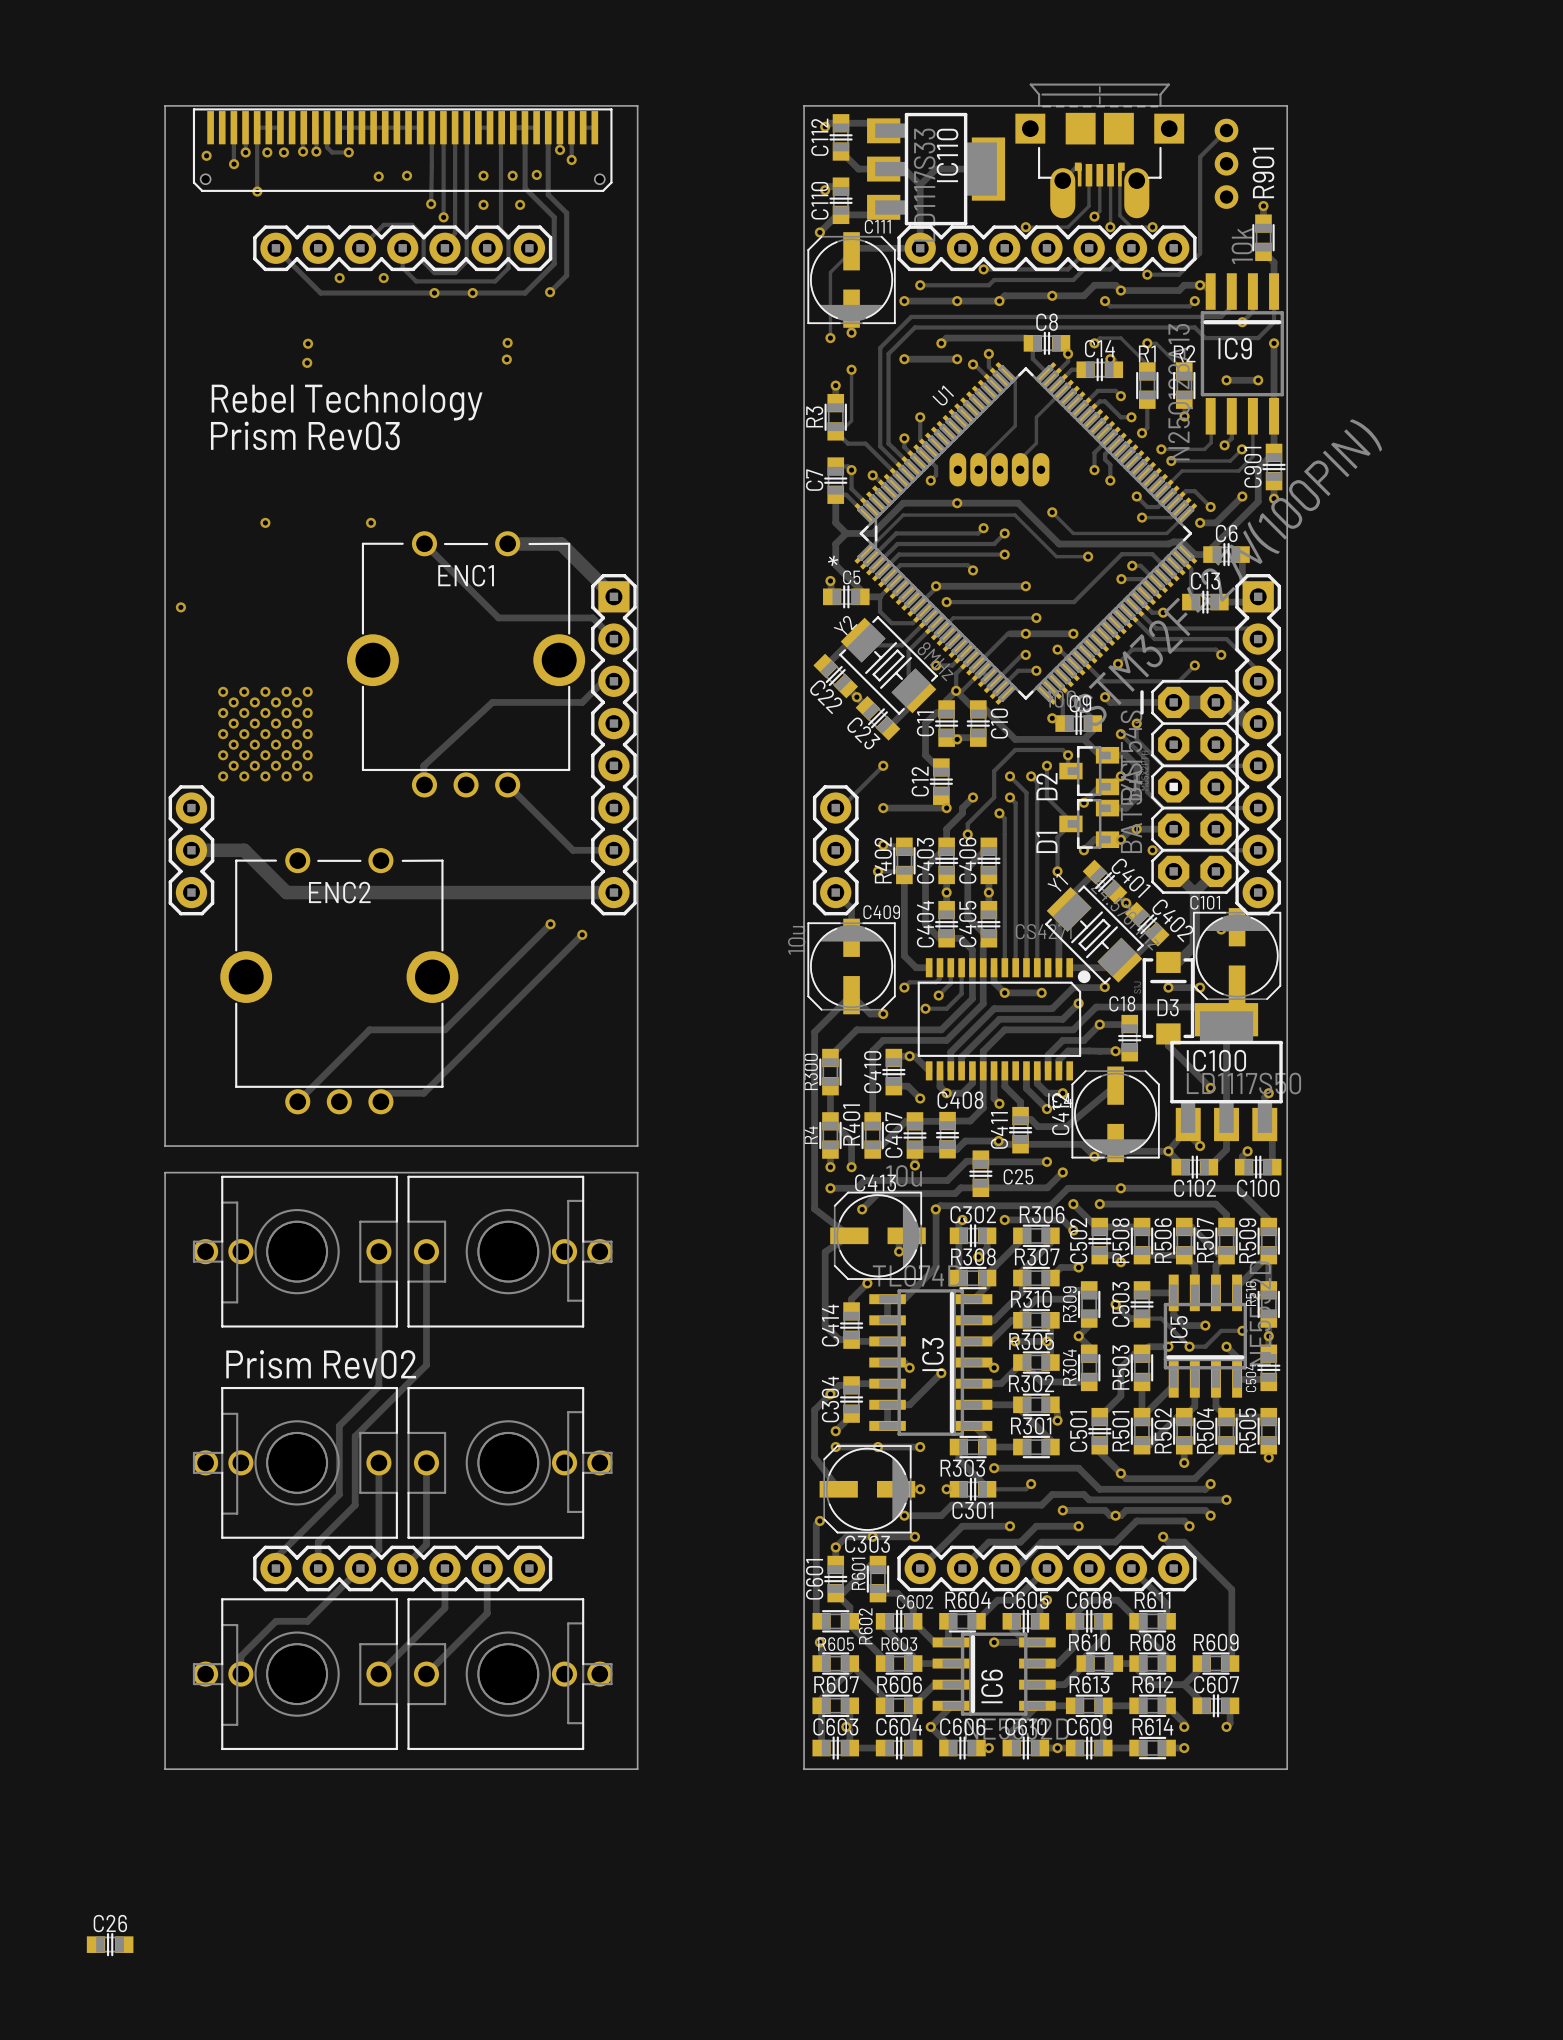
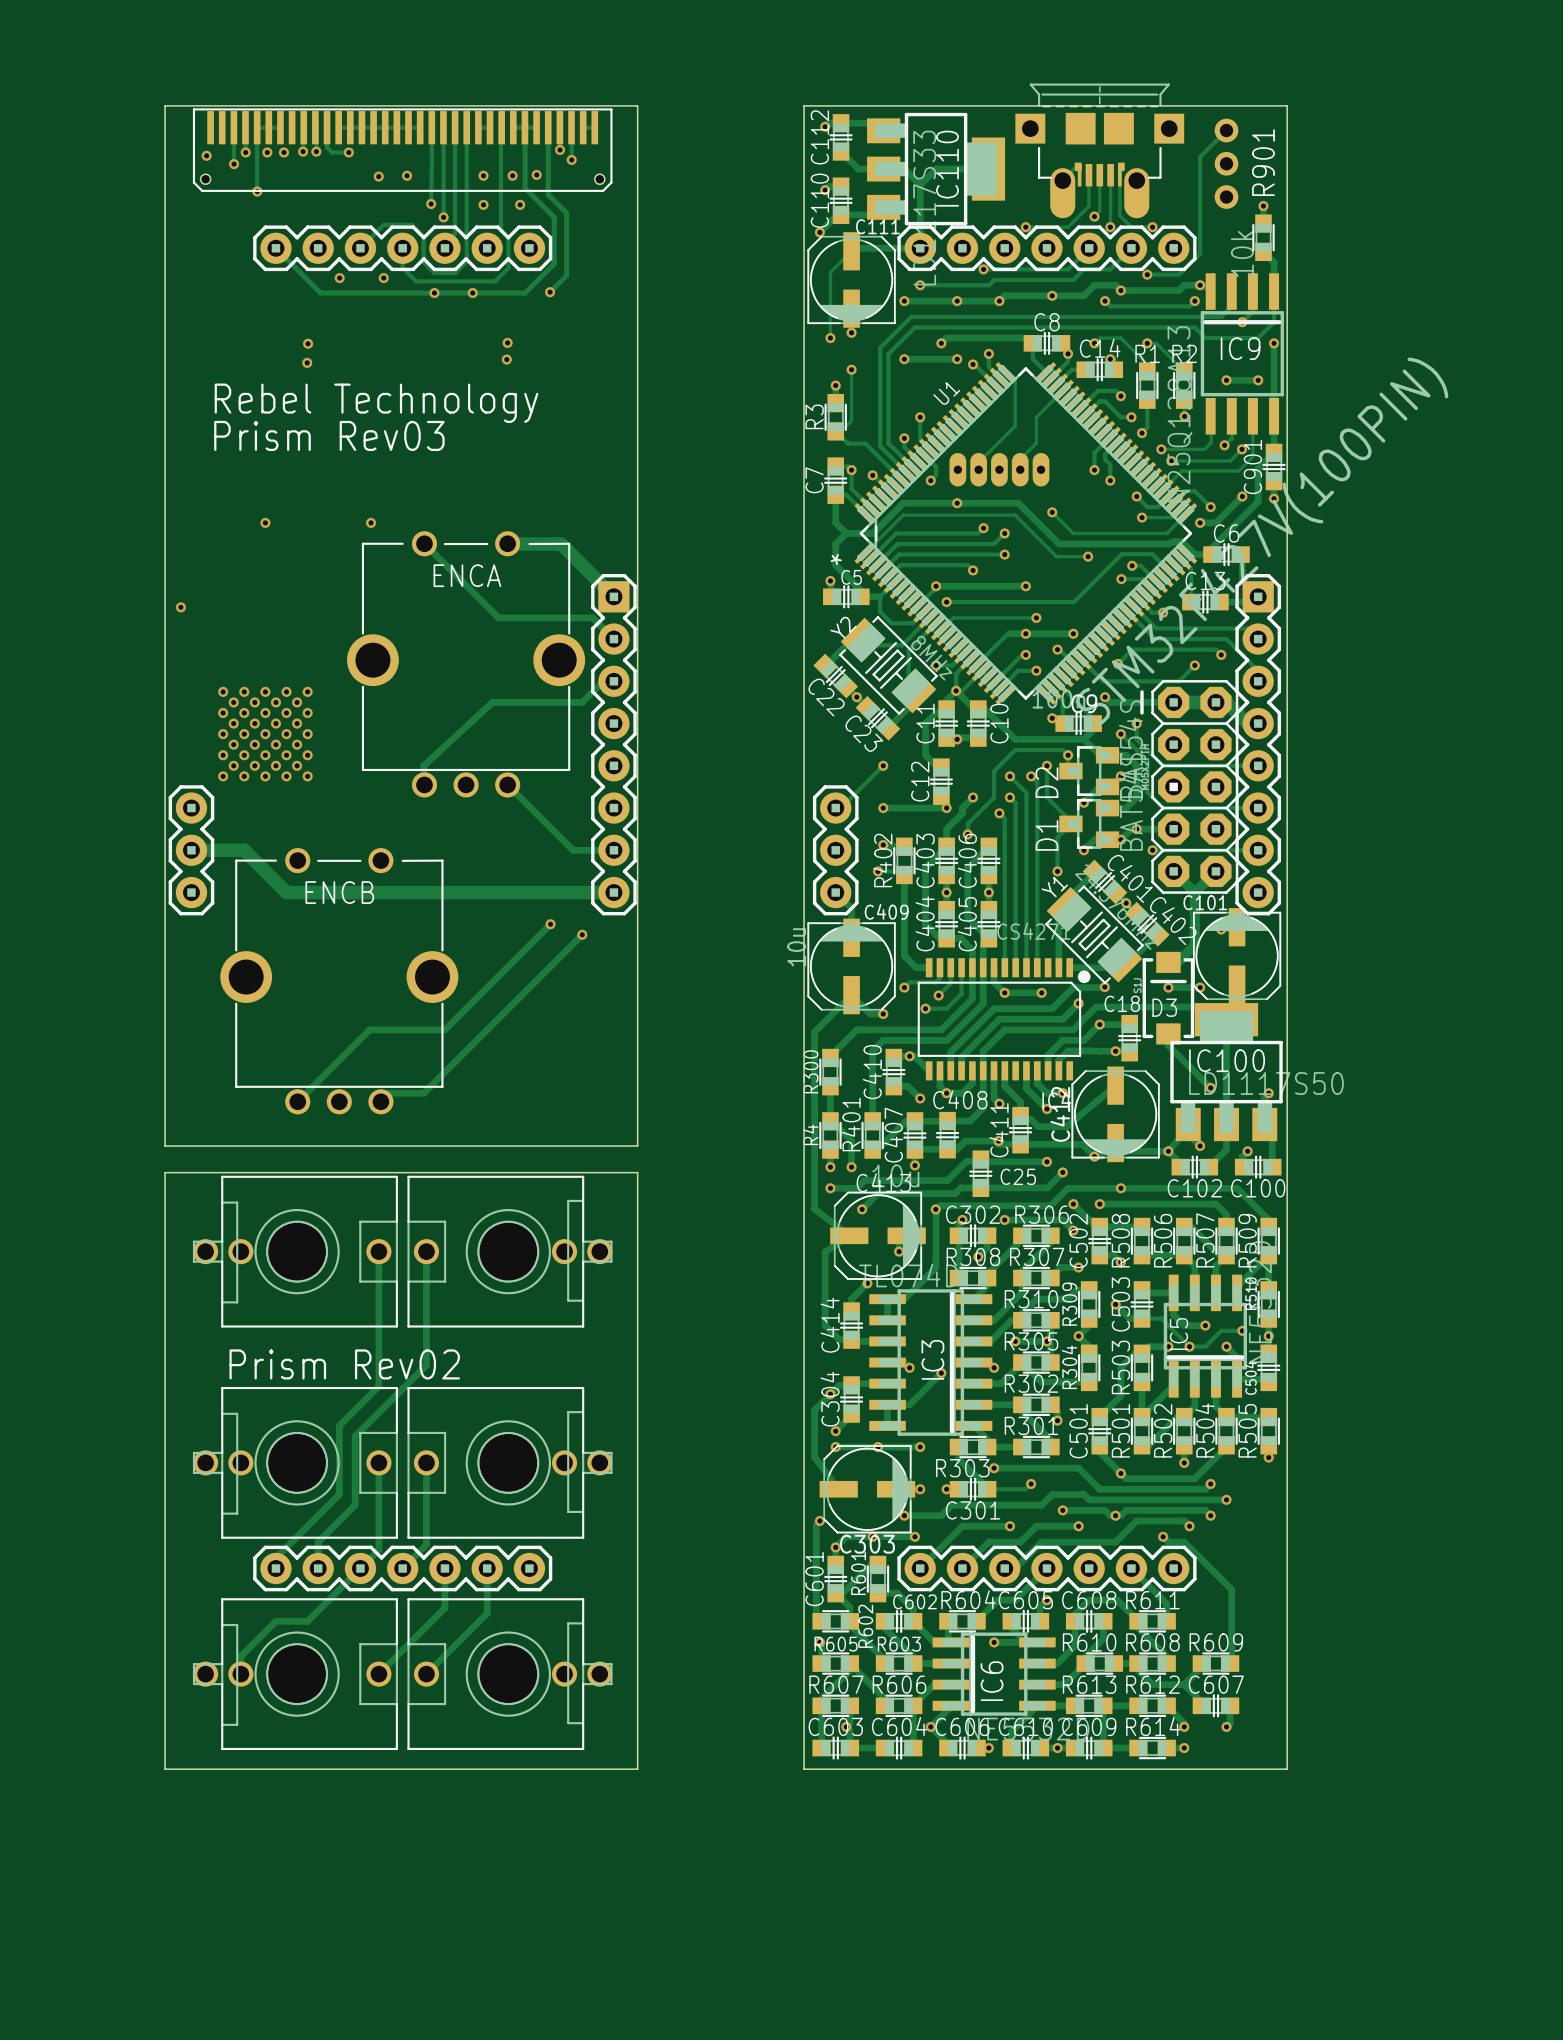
ENC1 name: ENC1 (466, 575) -> ENCA (467, 575)
ENC2 name: ENC2 (339, 892) -> ENCB (339, 892)
C26: (110, 1944) -> none

